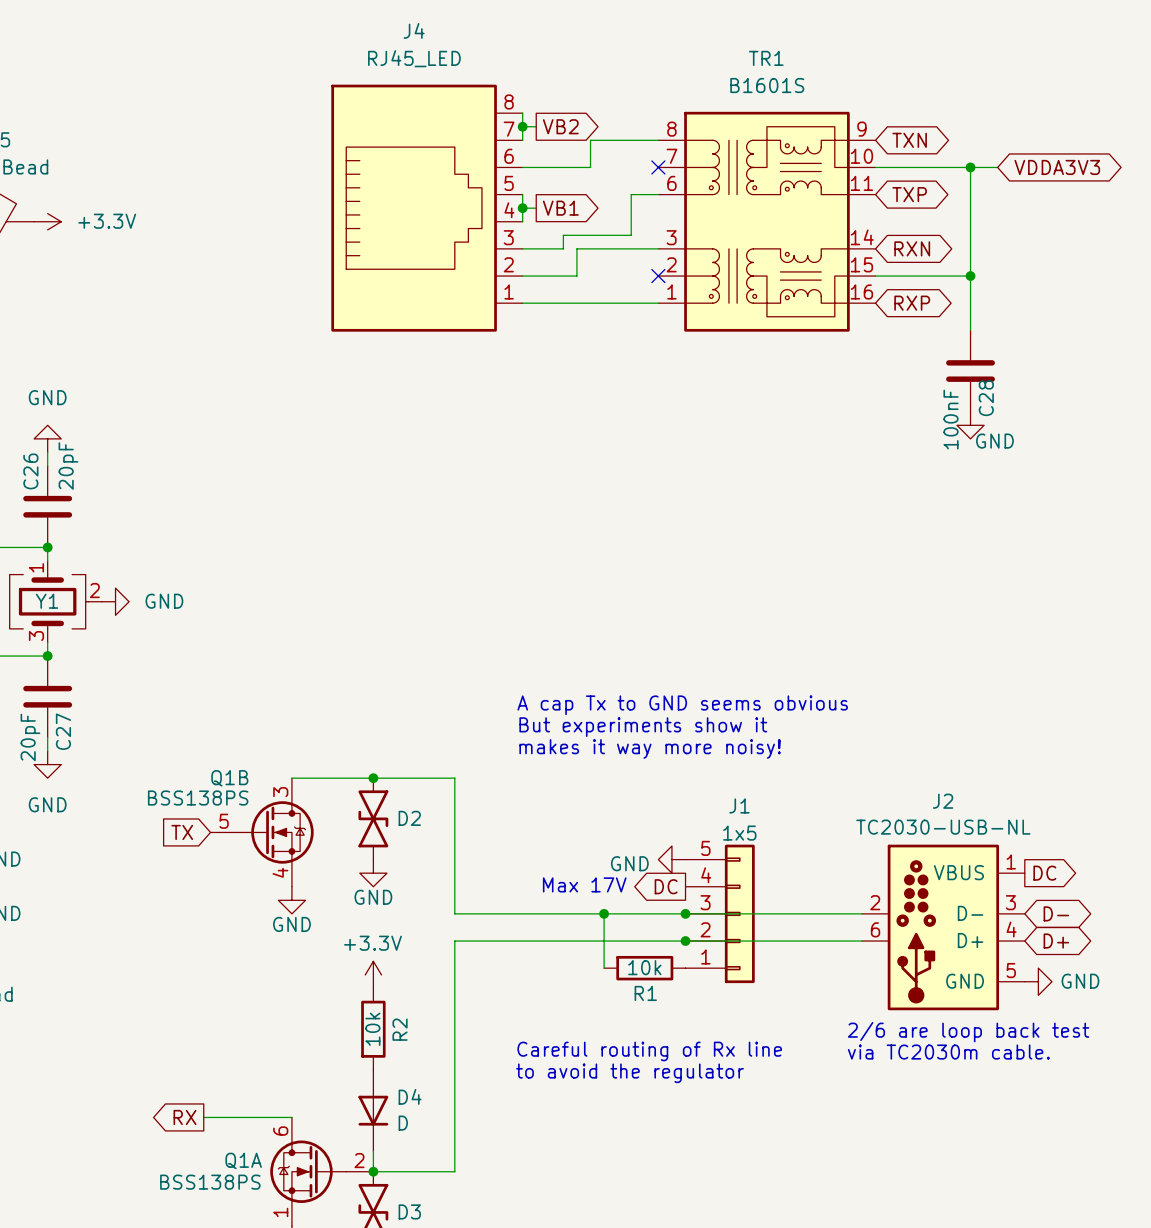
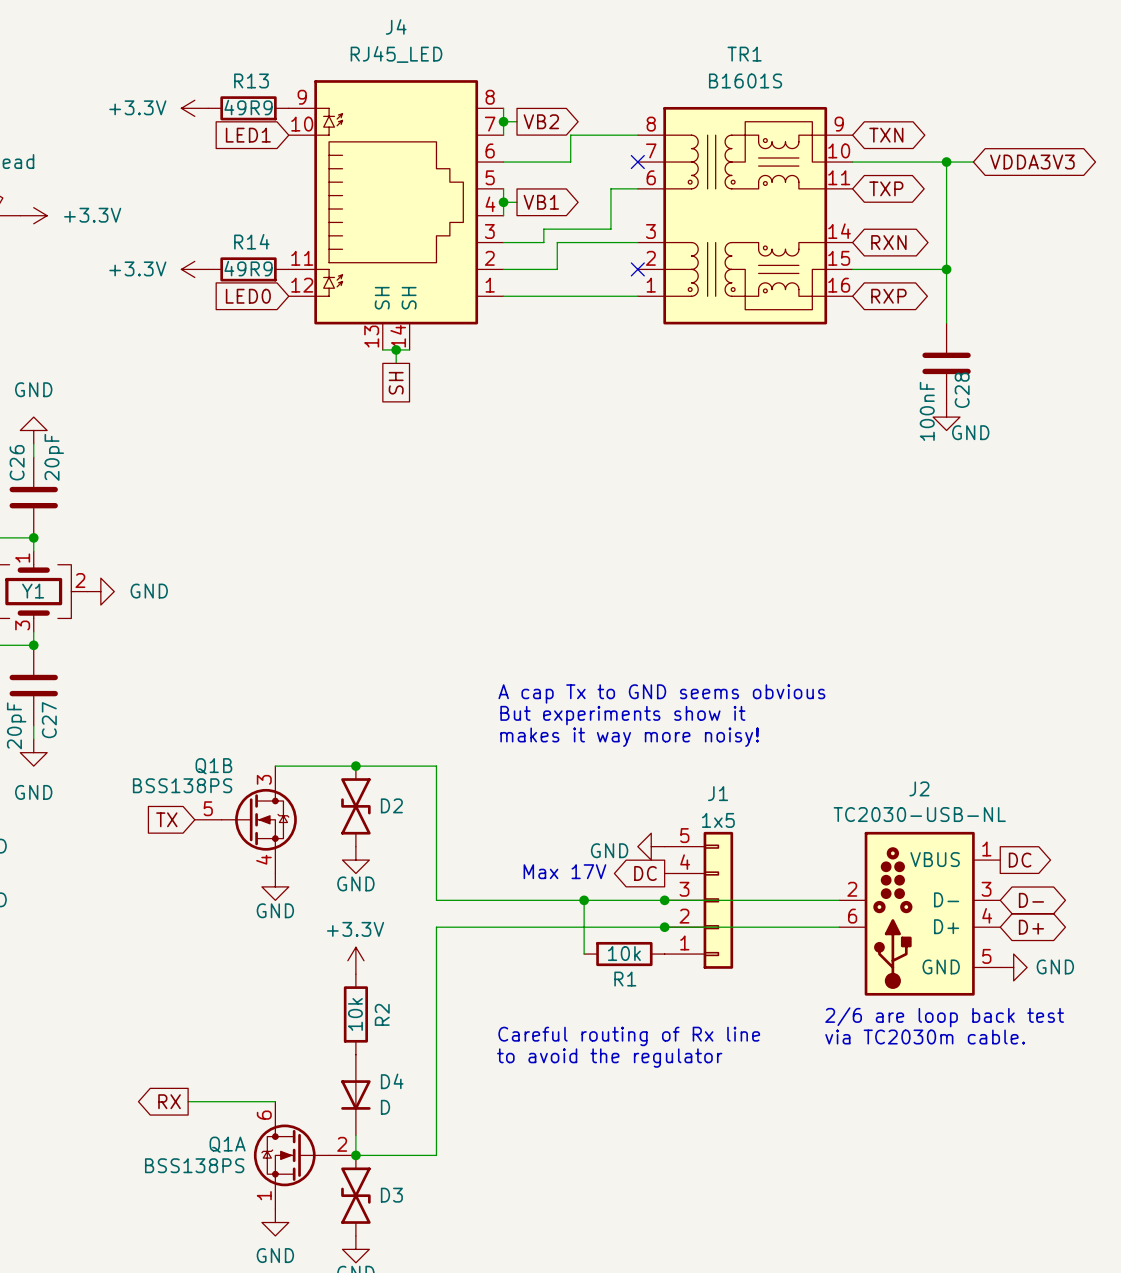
J4 symbol: [331, 84, 523, 332] -> [288, 80, 504, 350]
power symbol: none -> +3.3V (194, 108)
R13: none -> 49R9 (248, 108)
global label: none -> LED1 (248, 135)
power symbol: none -> +3.3V (194, 269)
R14: none -> 49R9 (248, 269)
global label: none -> LED0 (248, 296)
wire: none -> (382, 349) (409, 349)
wire: none -> (396, 349) (396, 363)
junction: none -> (396, 349)
global label: none -> SH (396, 383)

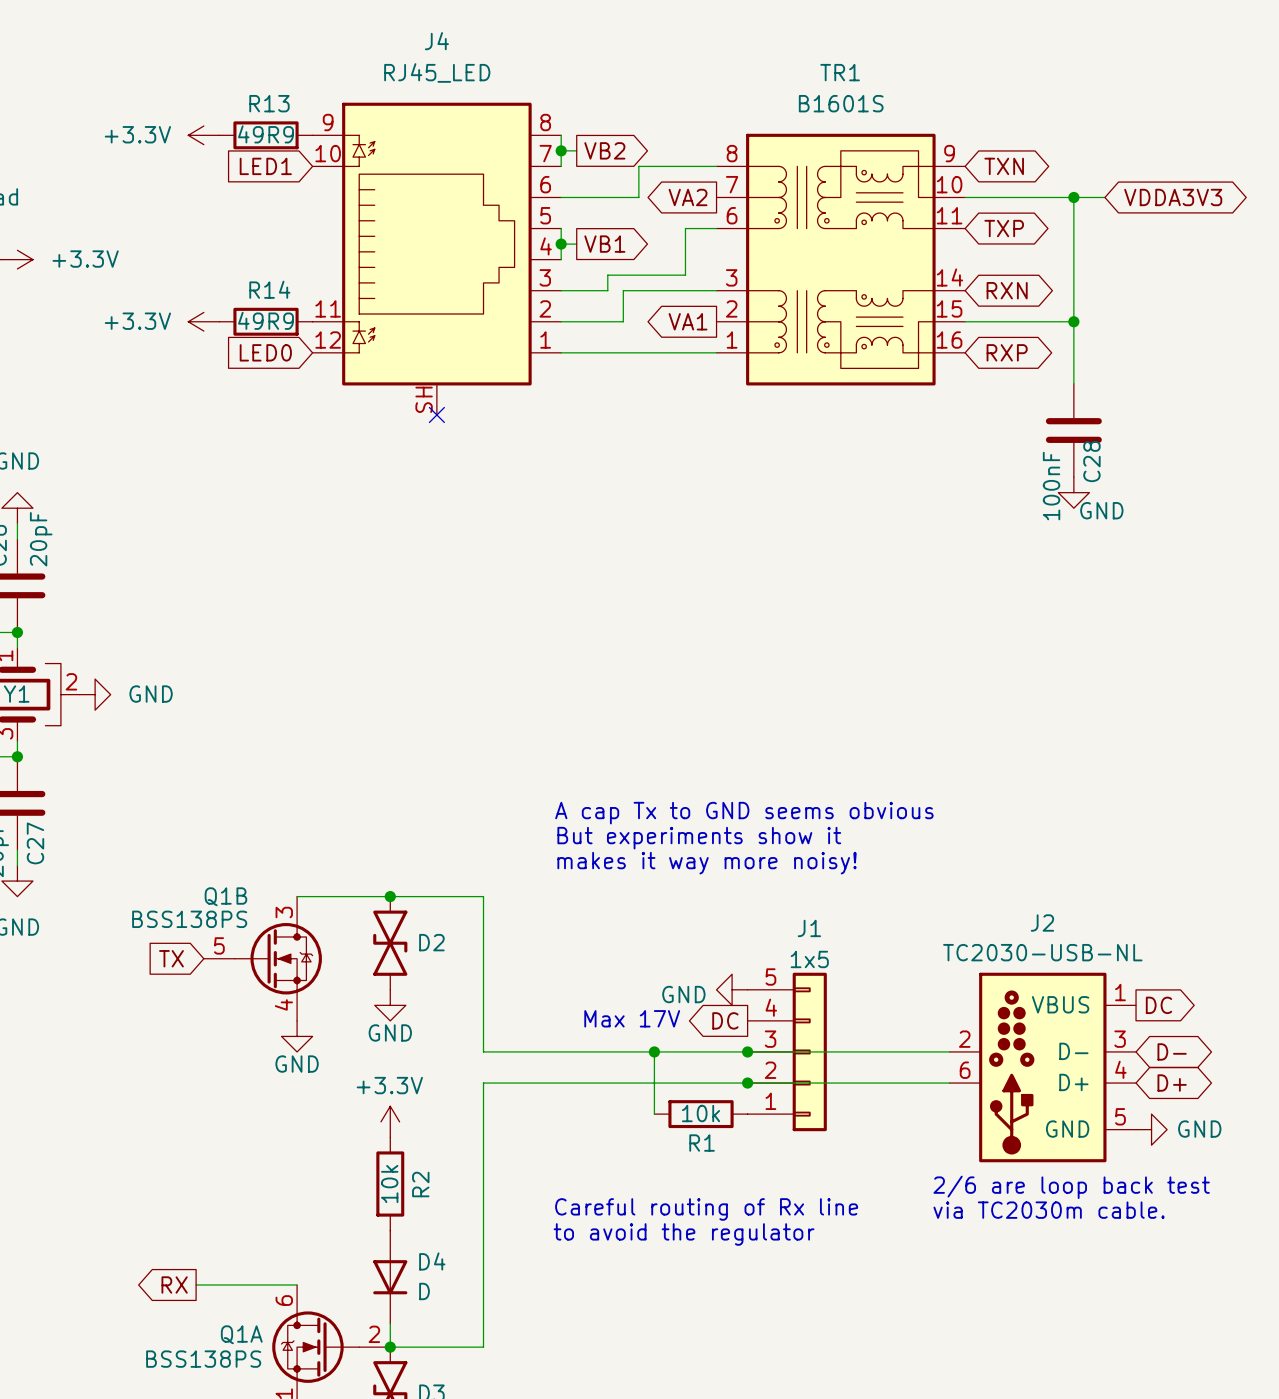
J4 symbol: [288, 80, 504, 350] -> [312, 102, 562, 415]
global label: none -> VA2 (688, 197)
no-connect mark: (637, 162) -> none
global label: none -> VA1 (688, 321)
no-connect mark: (637, 269) -> none
wire: (382, 349) (409, 349) -> none
wire: (396, 349) (396, 363) -> none
junction: (396, 349) -> none
no-connect mark: none -> (436, 414)
global label: SH (396, 383) -> none

